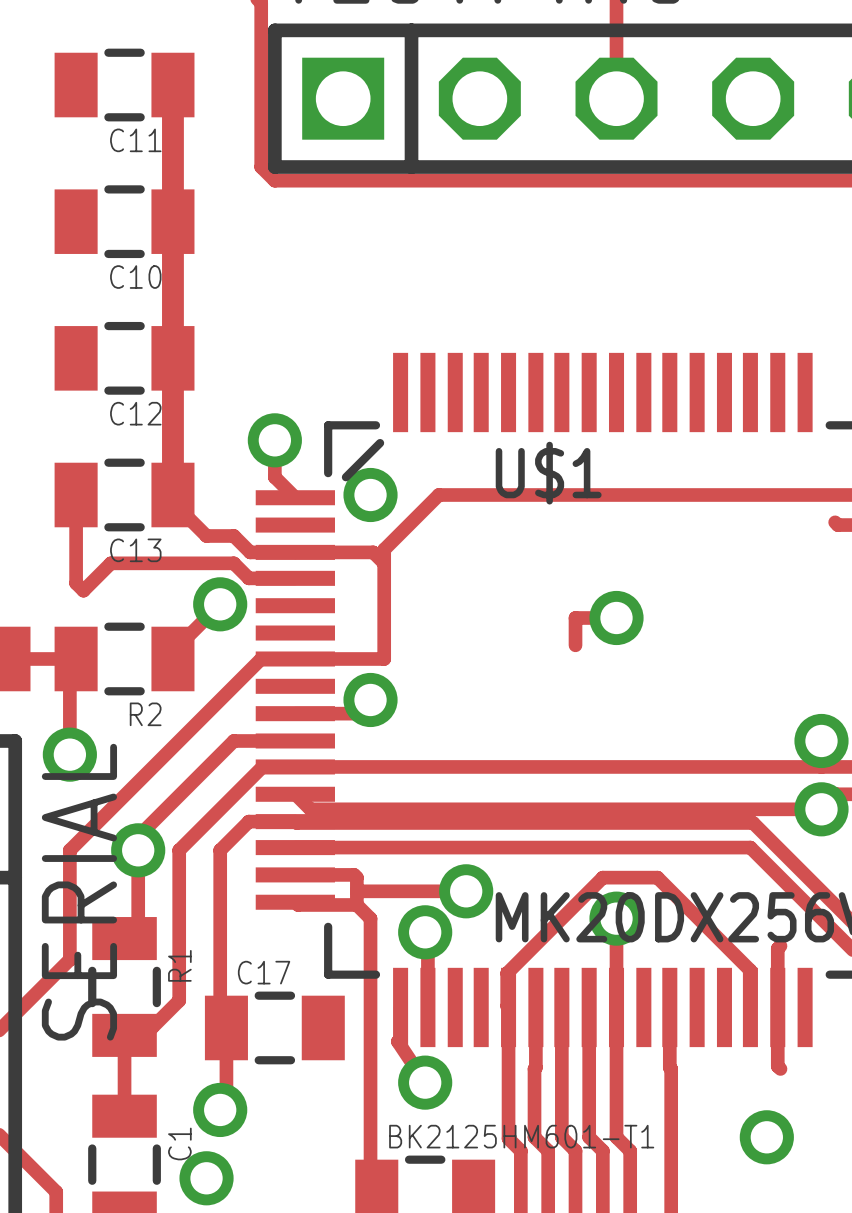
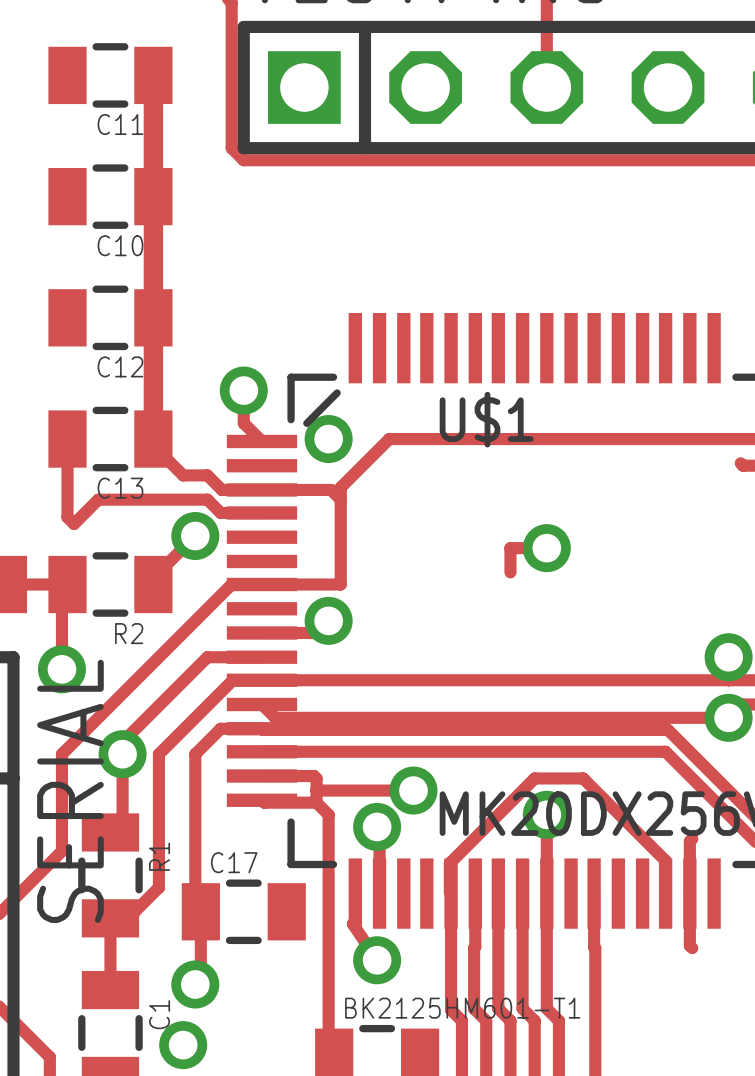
via: (766, 1137) -> none

